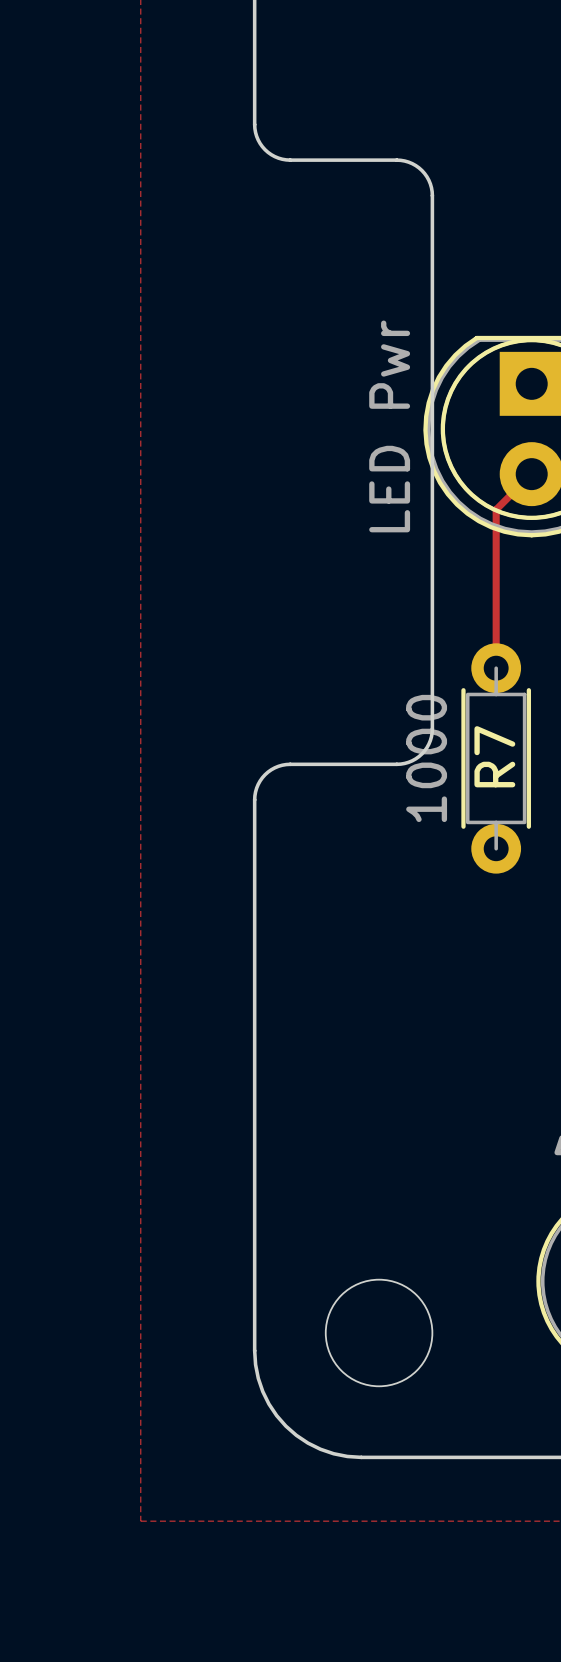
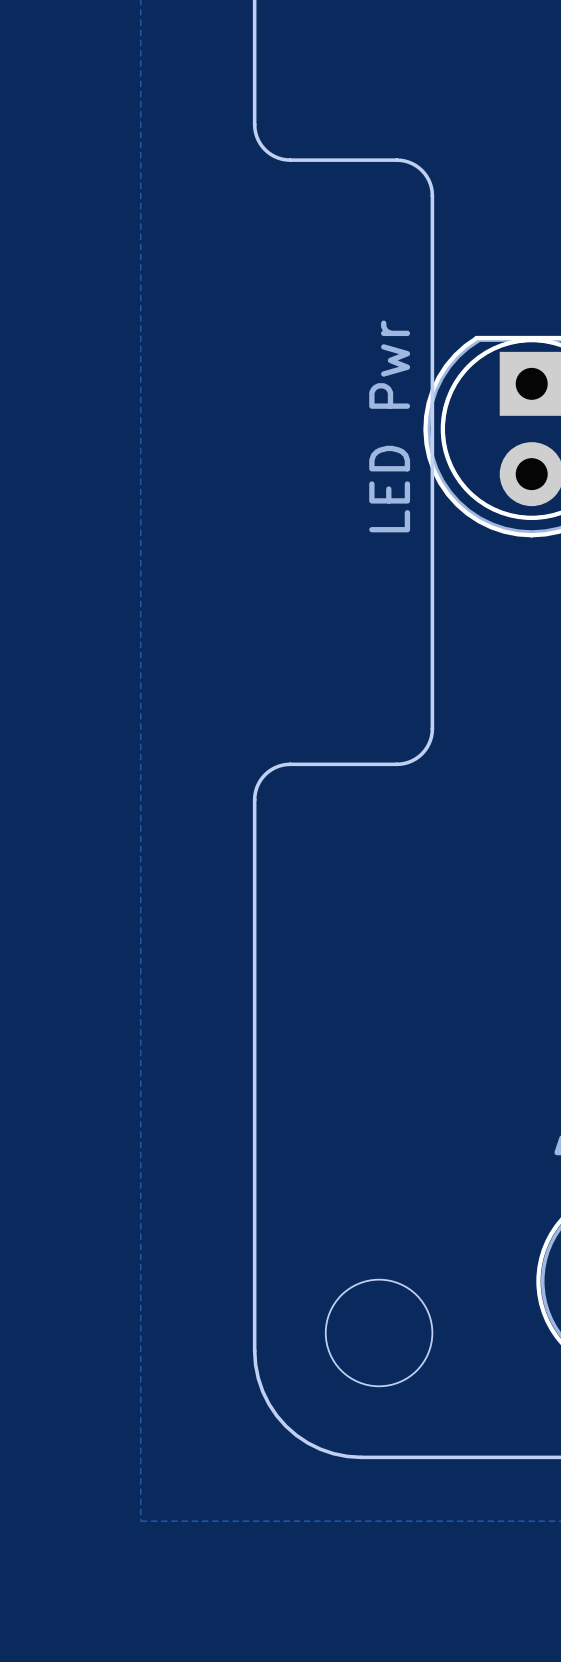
track: (531, 474) (496, 509) (496, 668) -> none
R7: 1000 (496, 758) -> none

